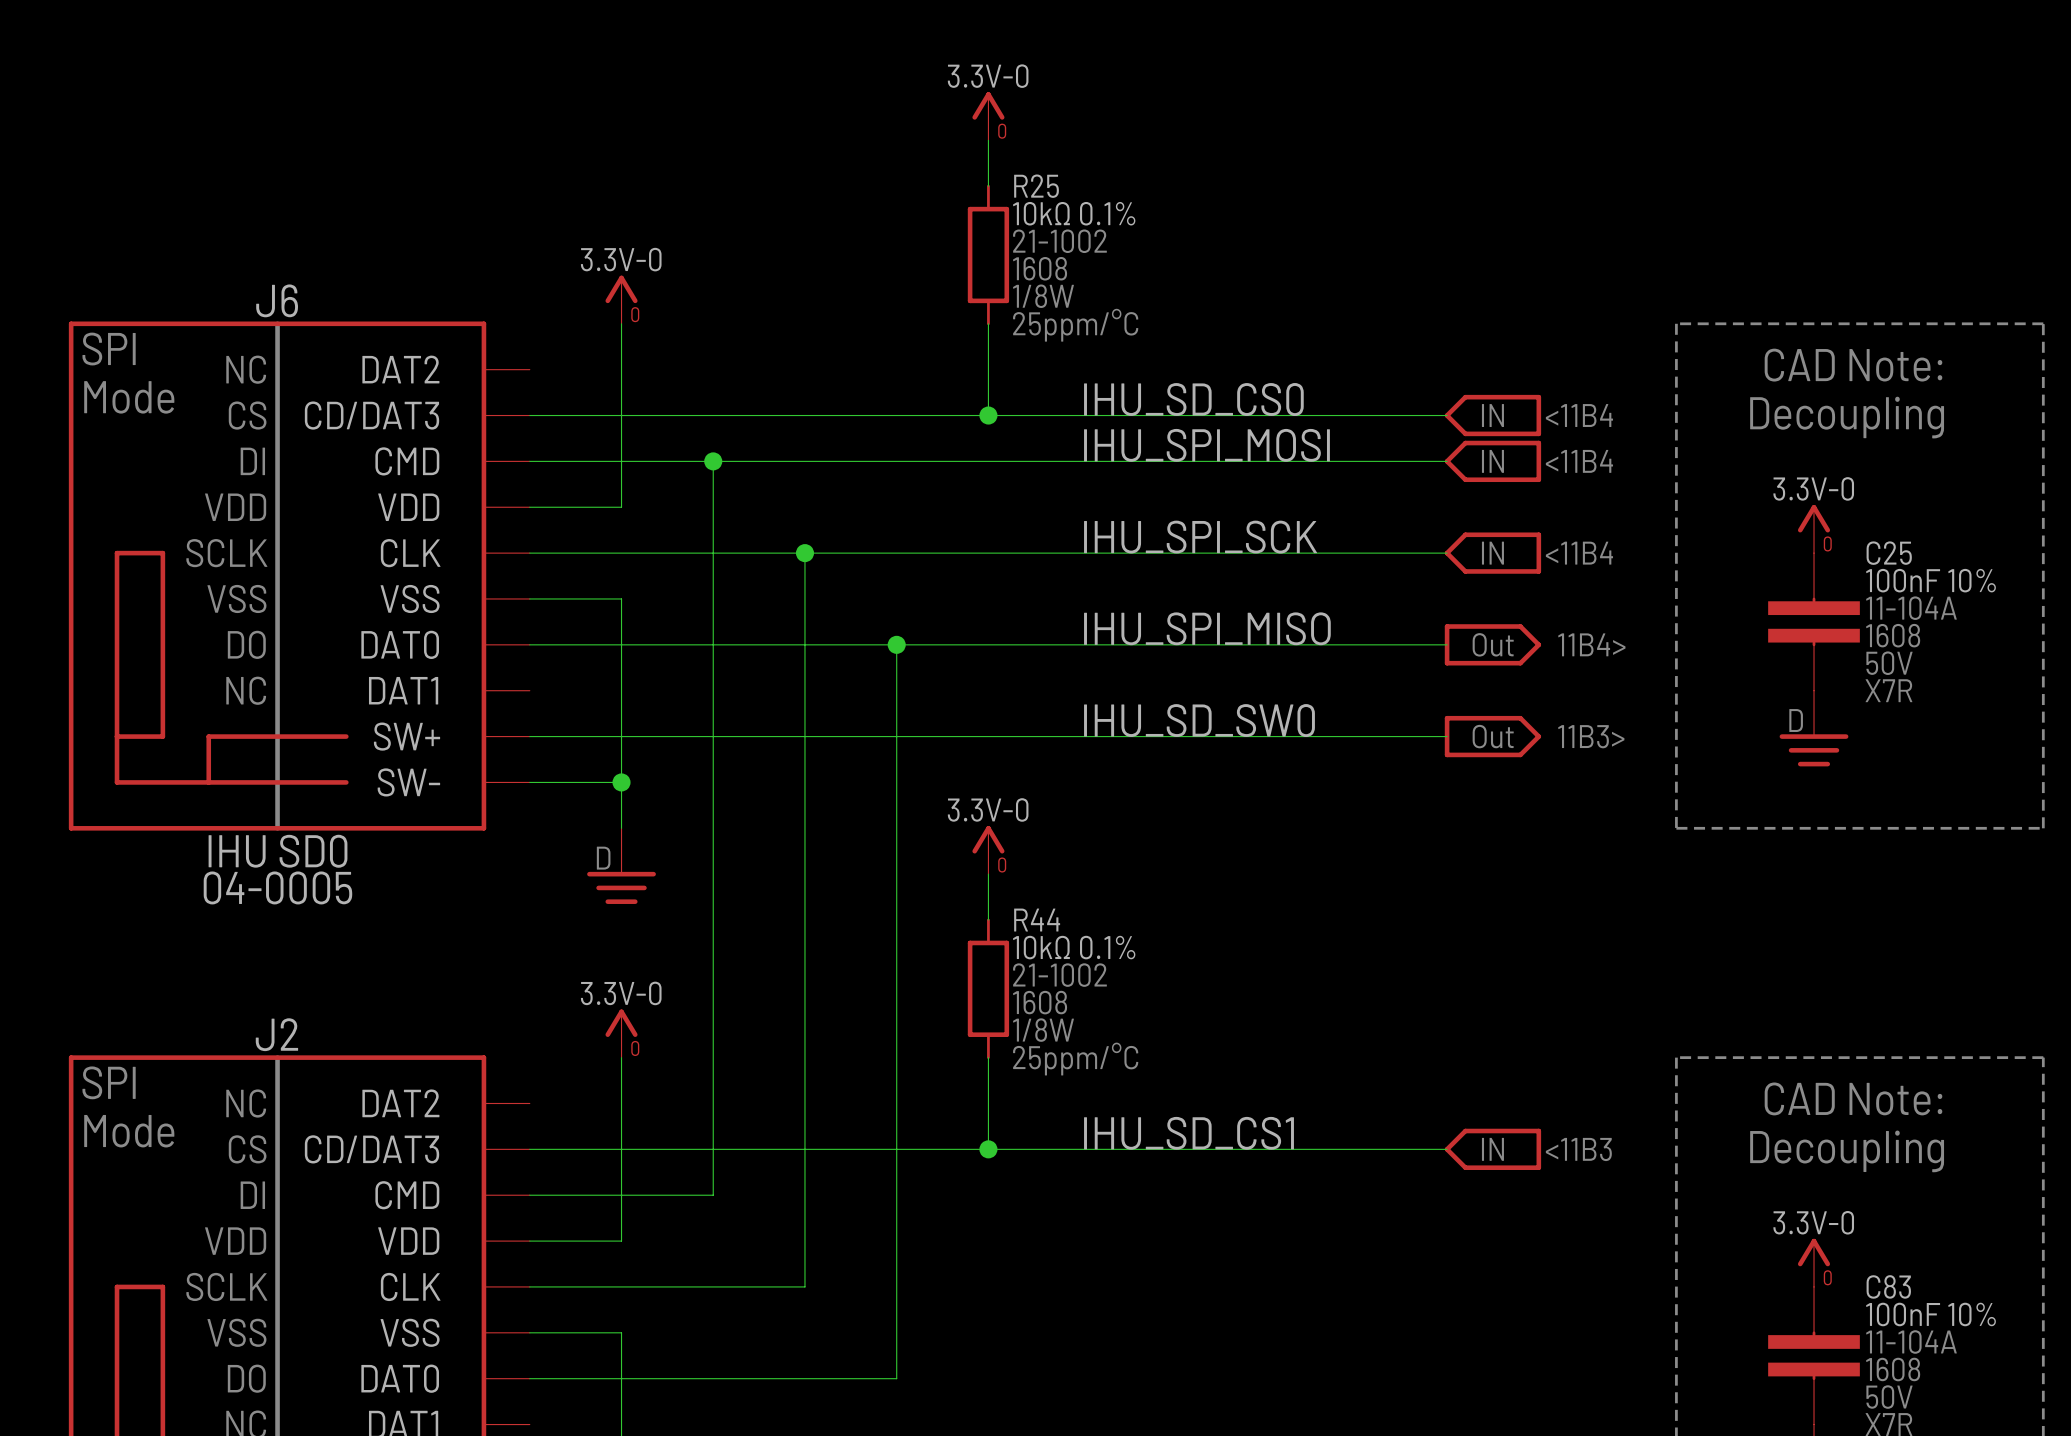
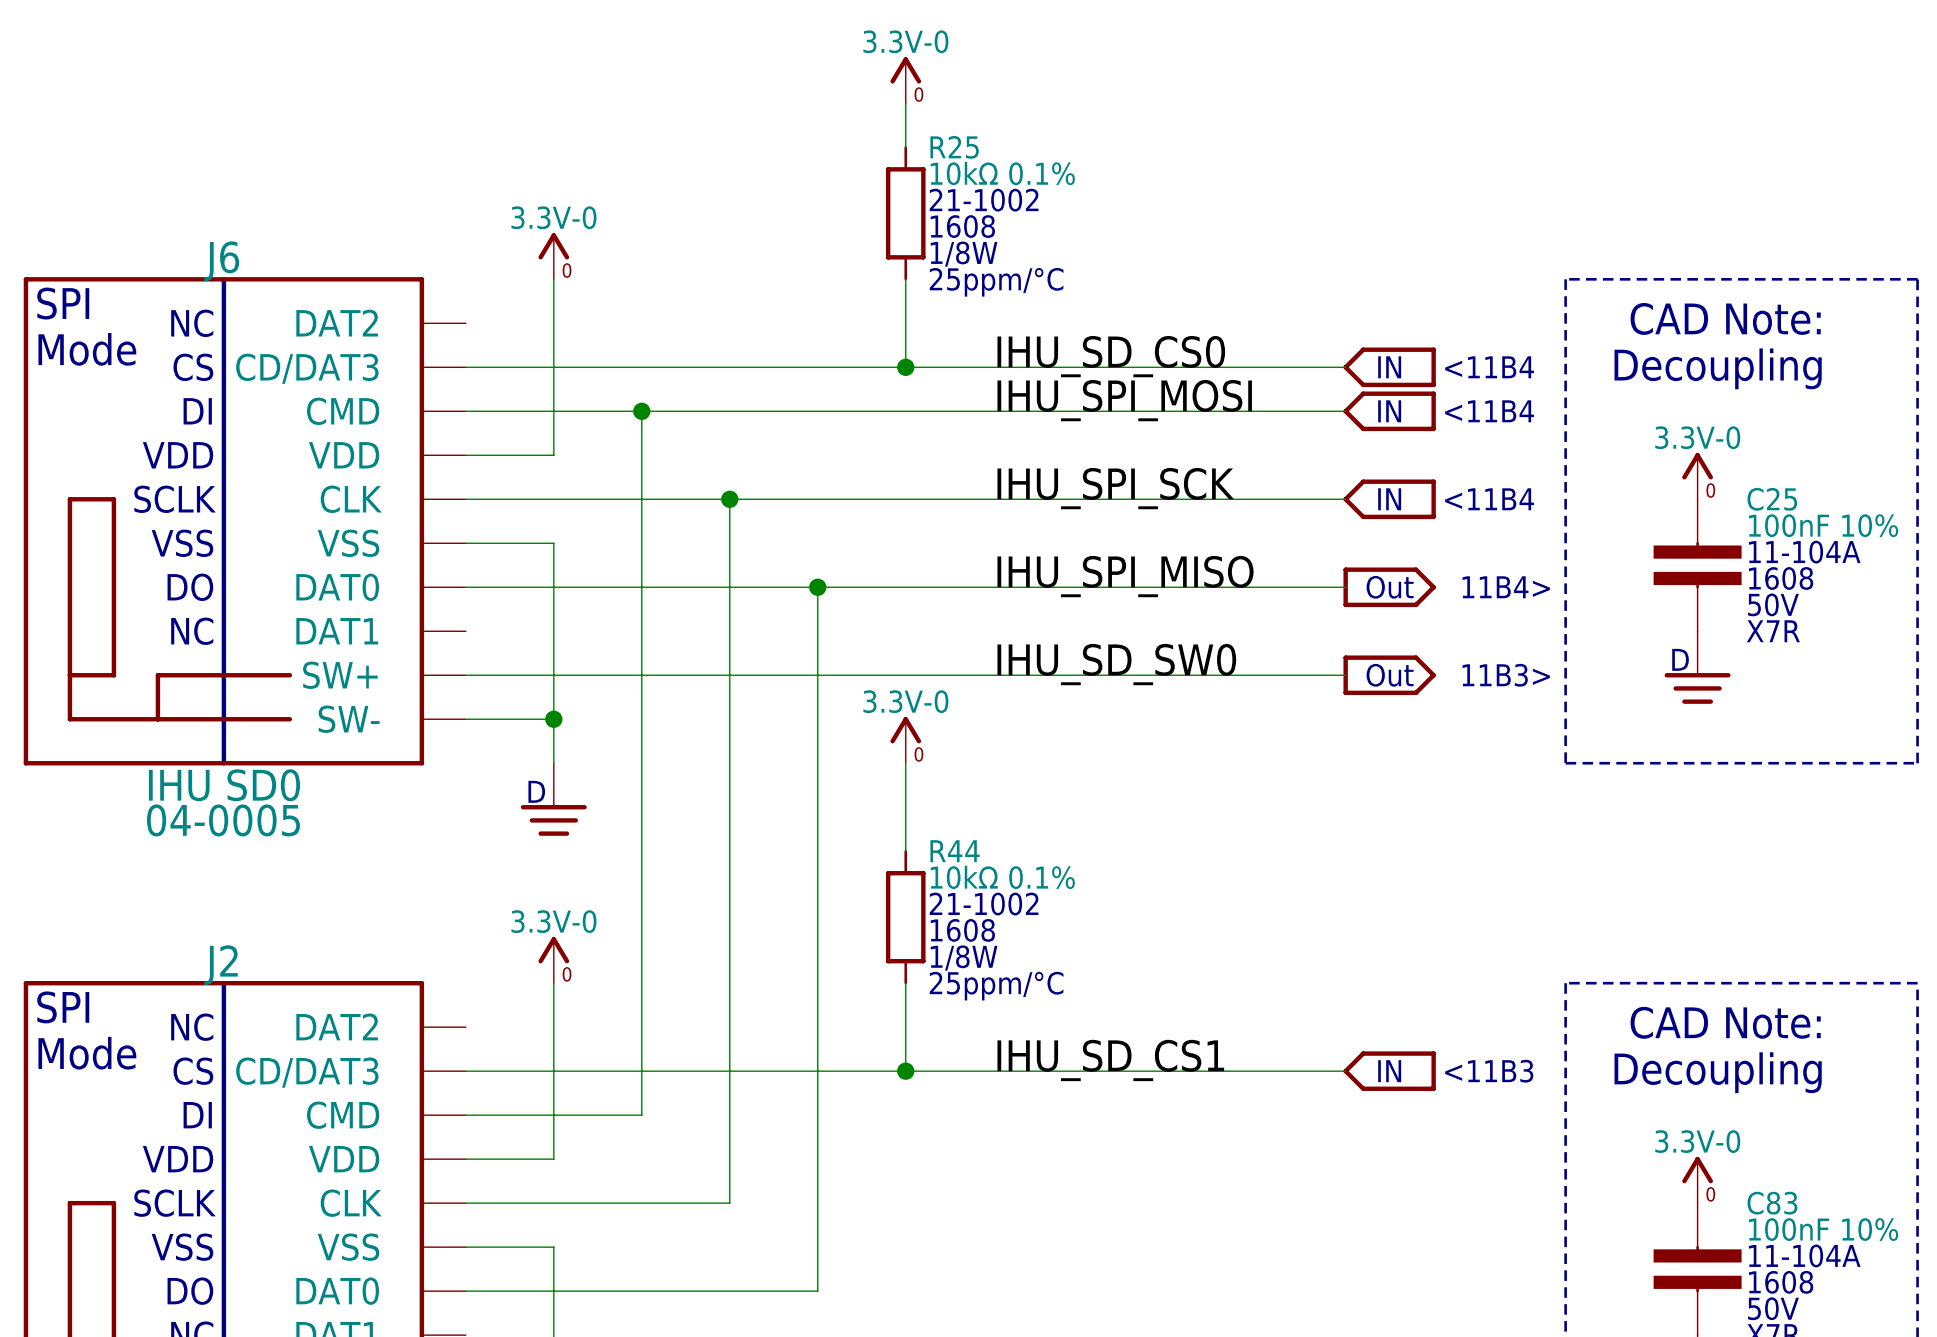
power symbol position: 3.3V-0 (988, 850) -> 3.3V-0 (905, 740)

